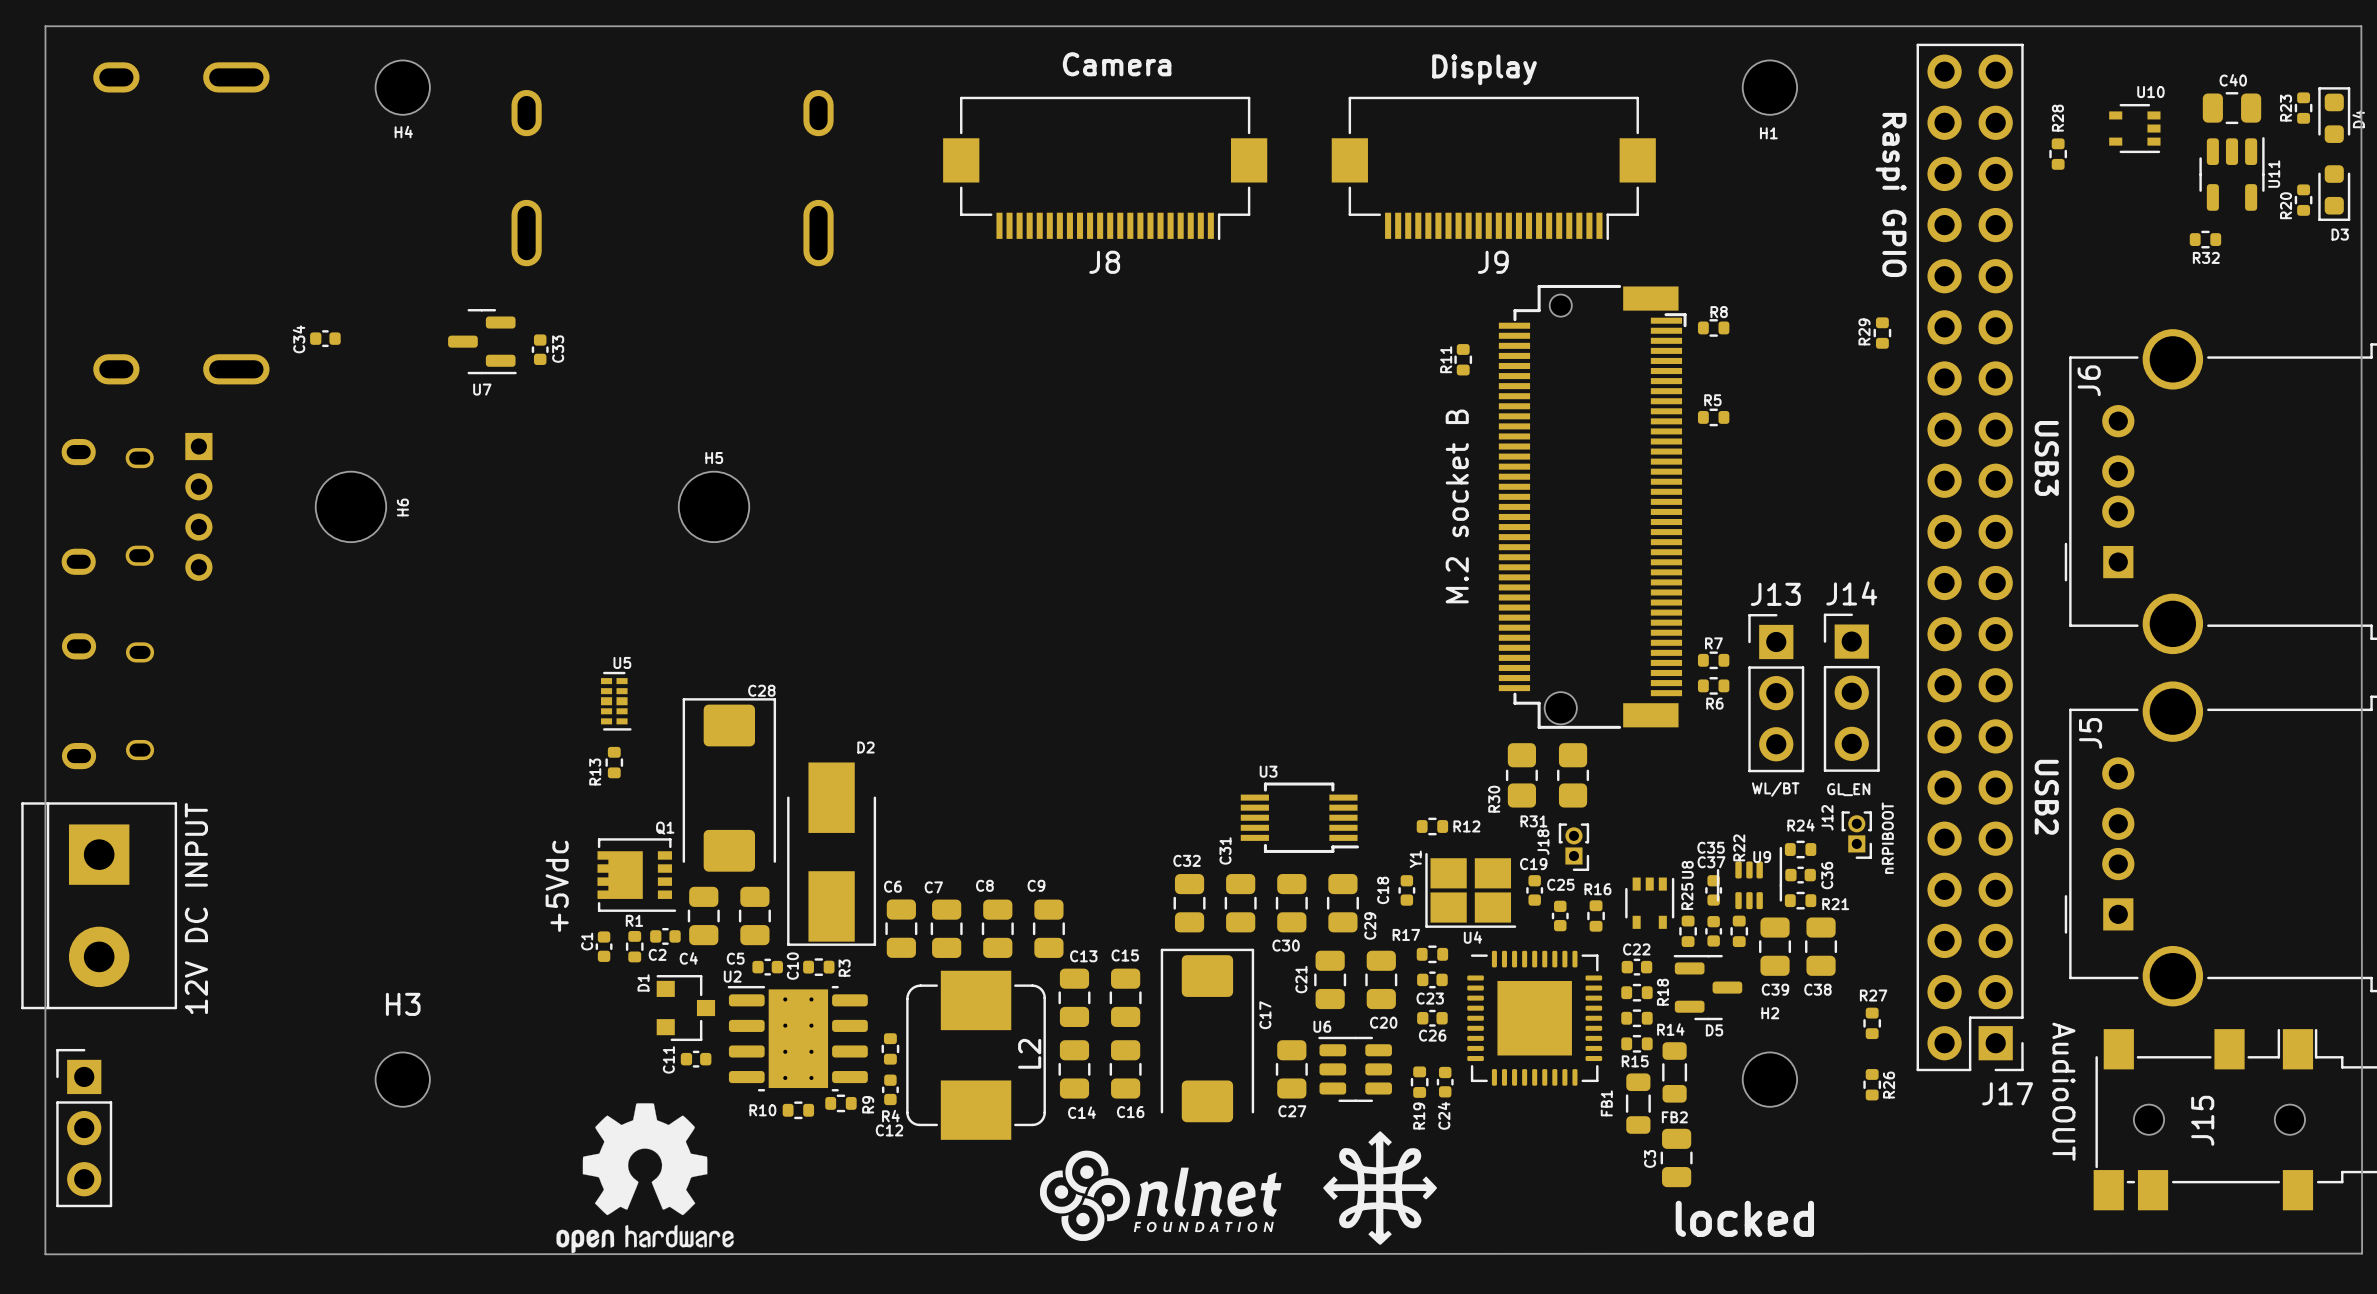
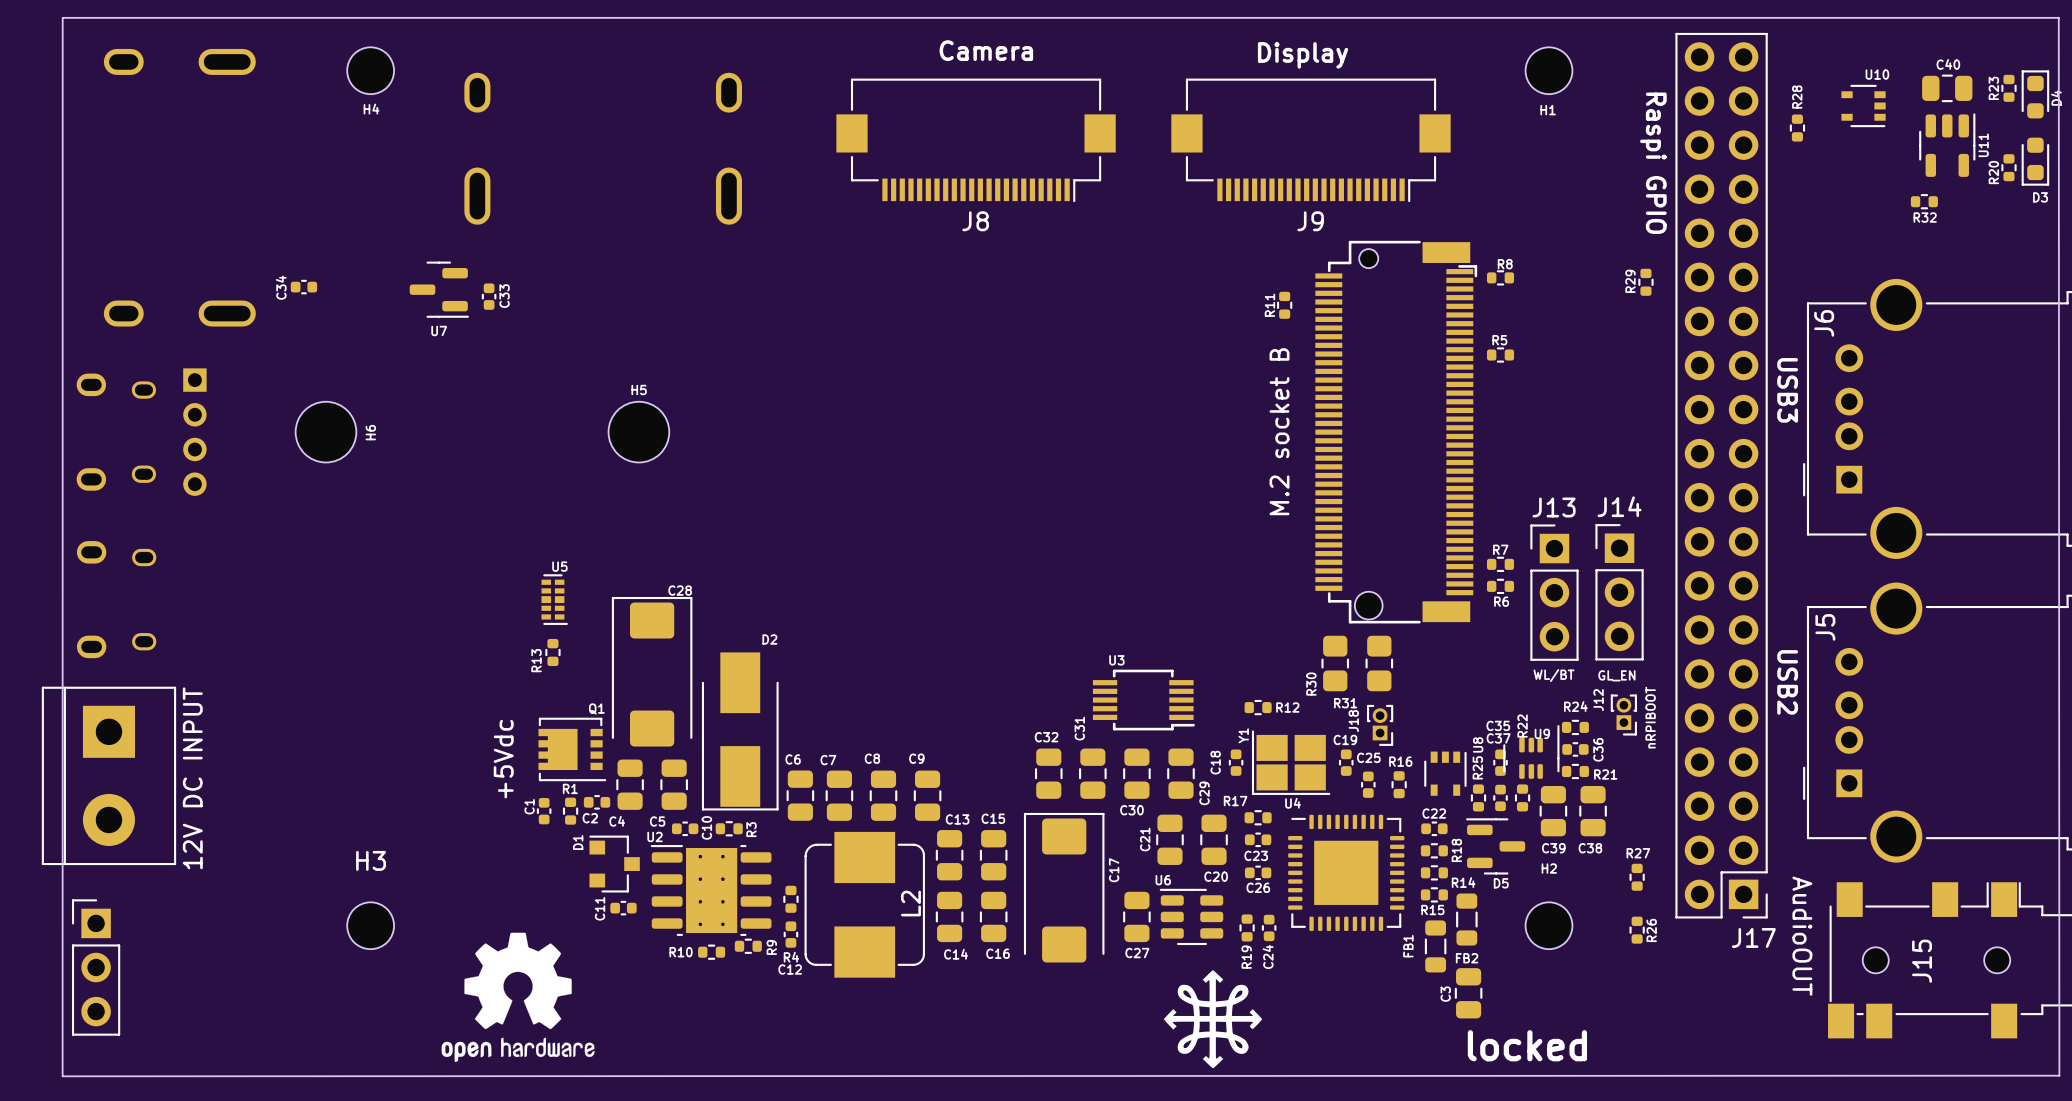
drawing: [1040, 1150, 1282, 1241] -> none
drawing position: (645, 1178) -> (518, 997)

